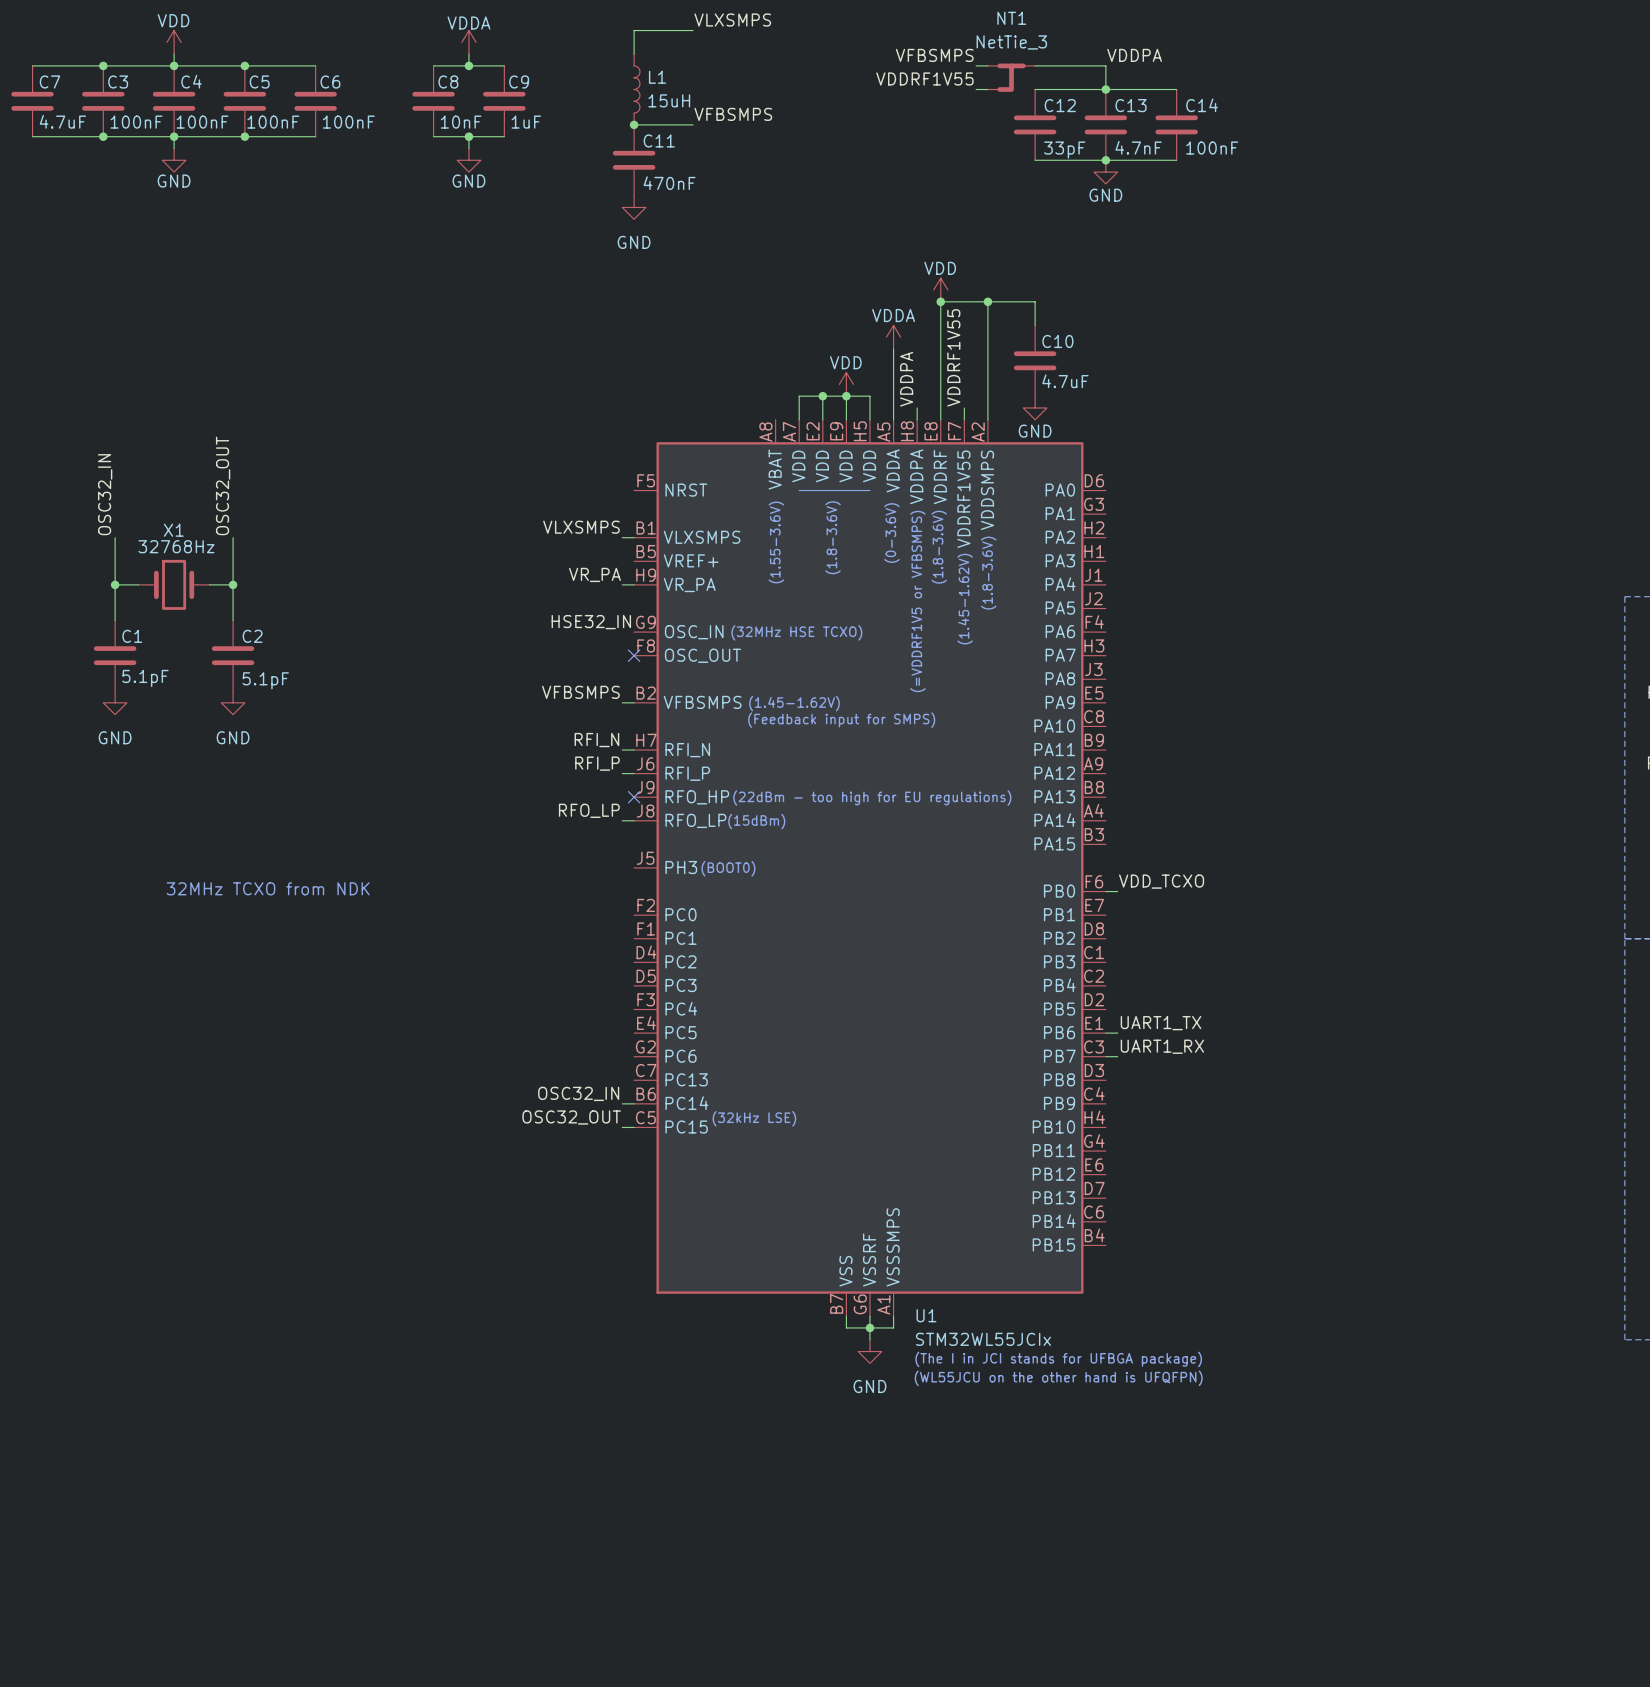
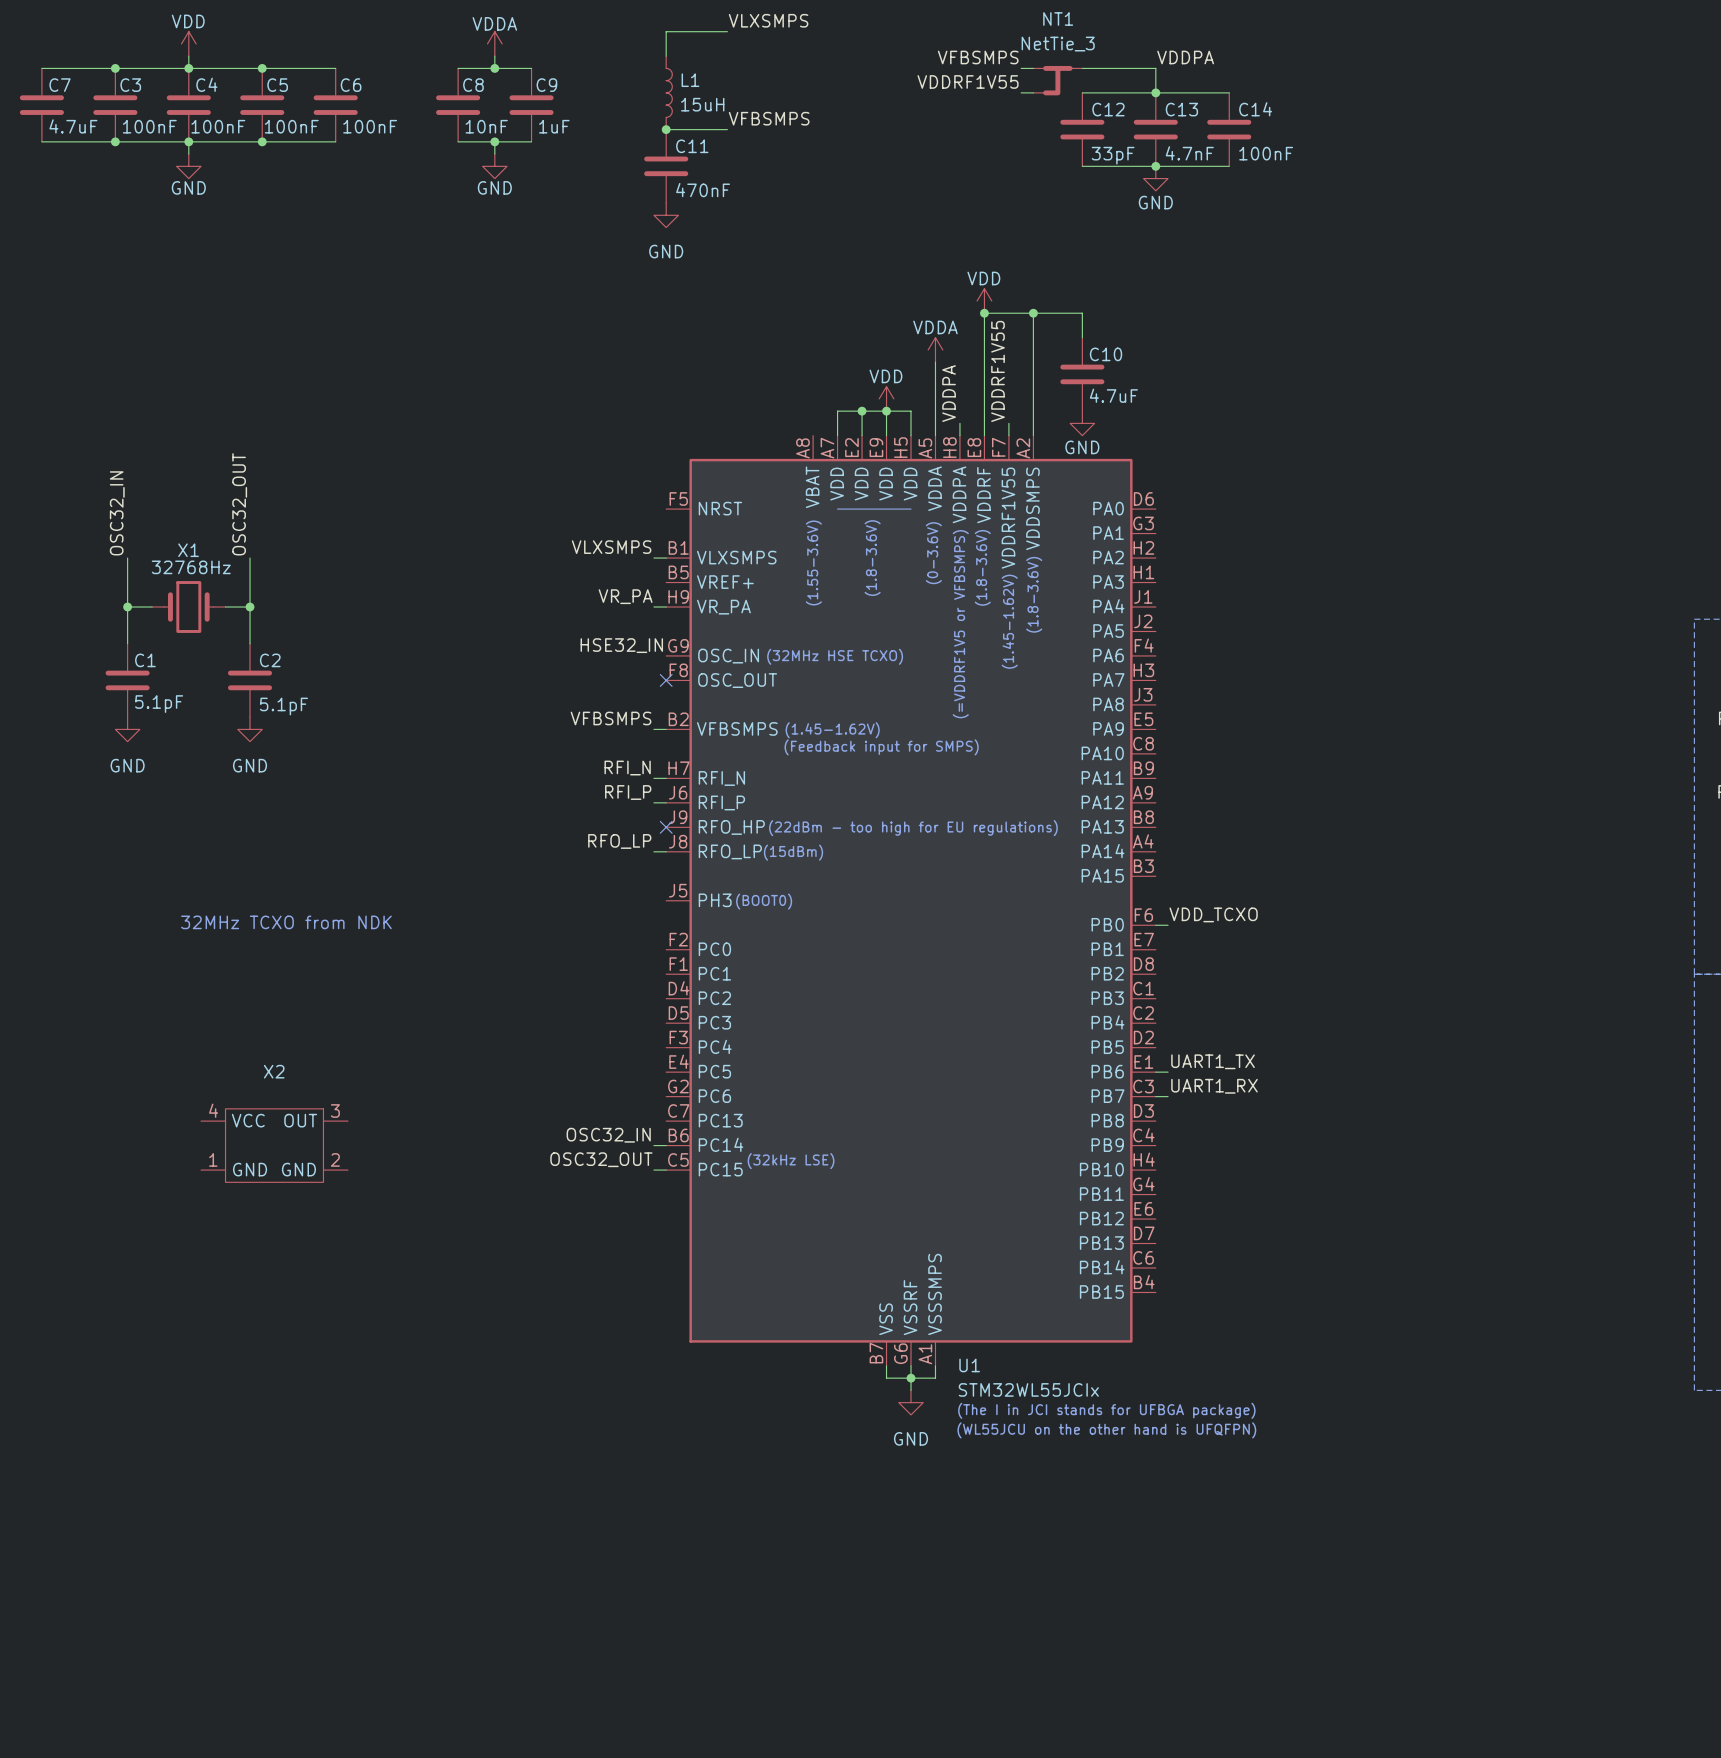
X2: none -> (274, 1145)

